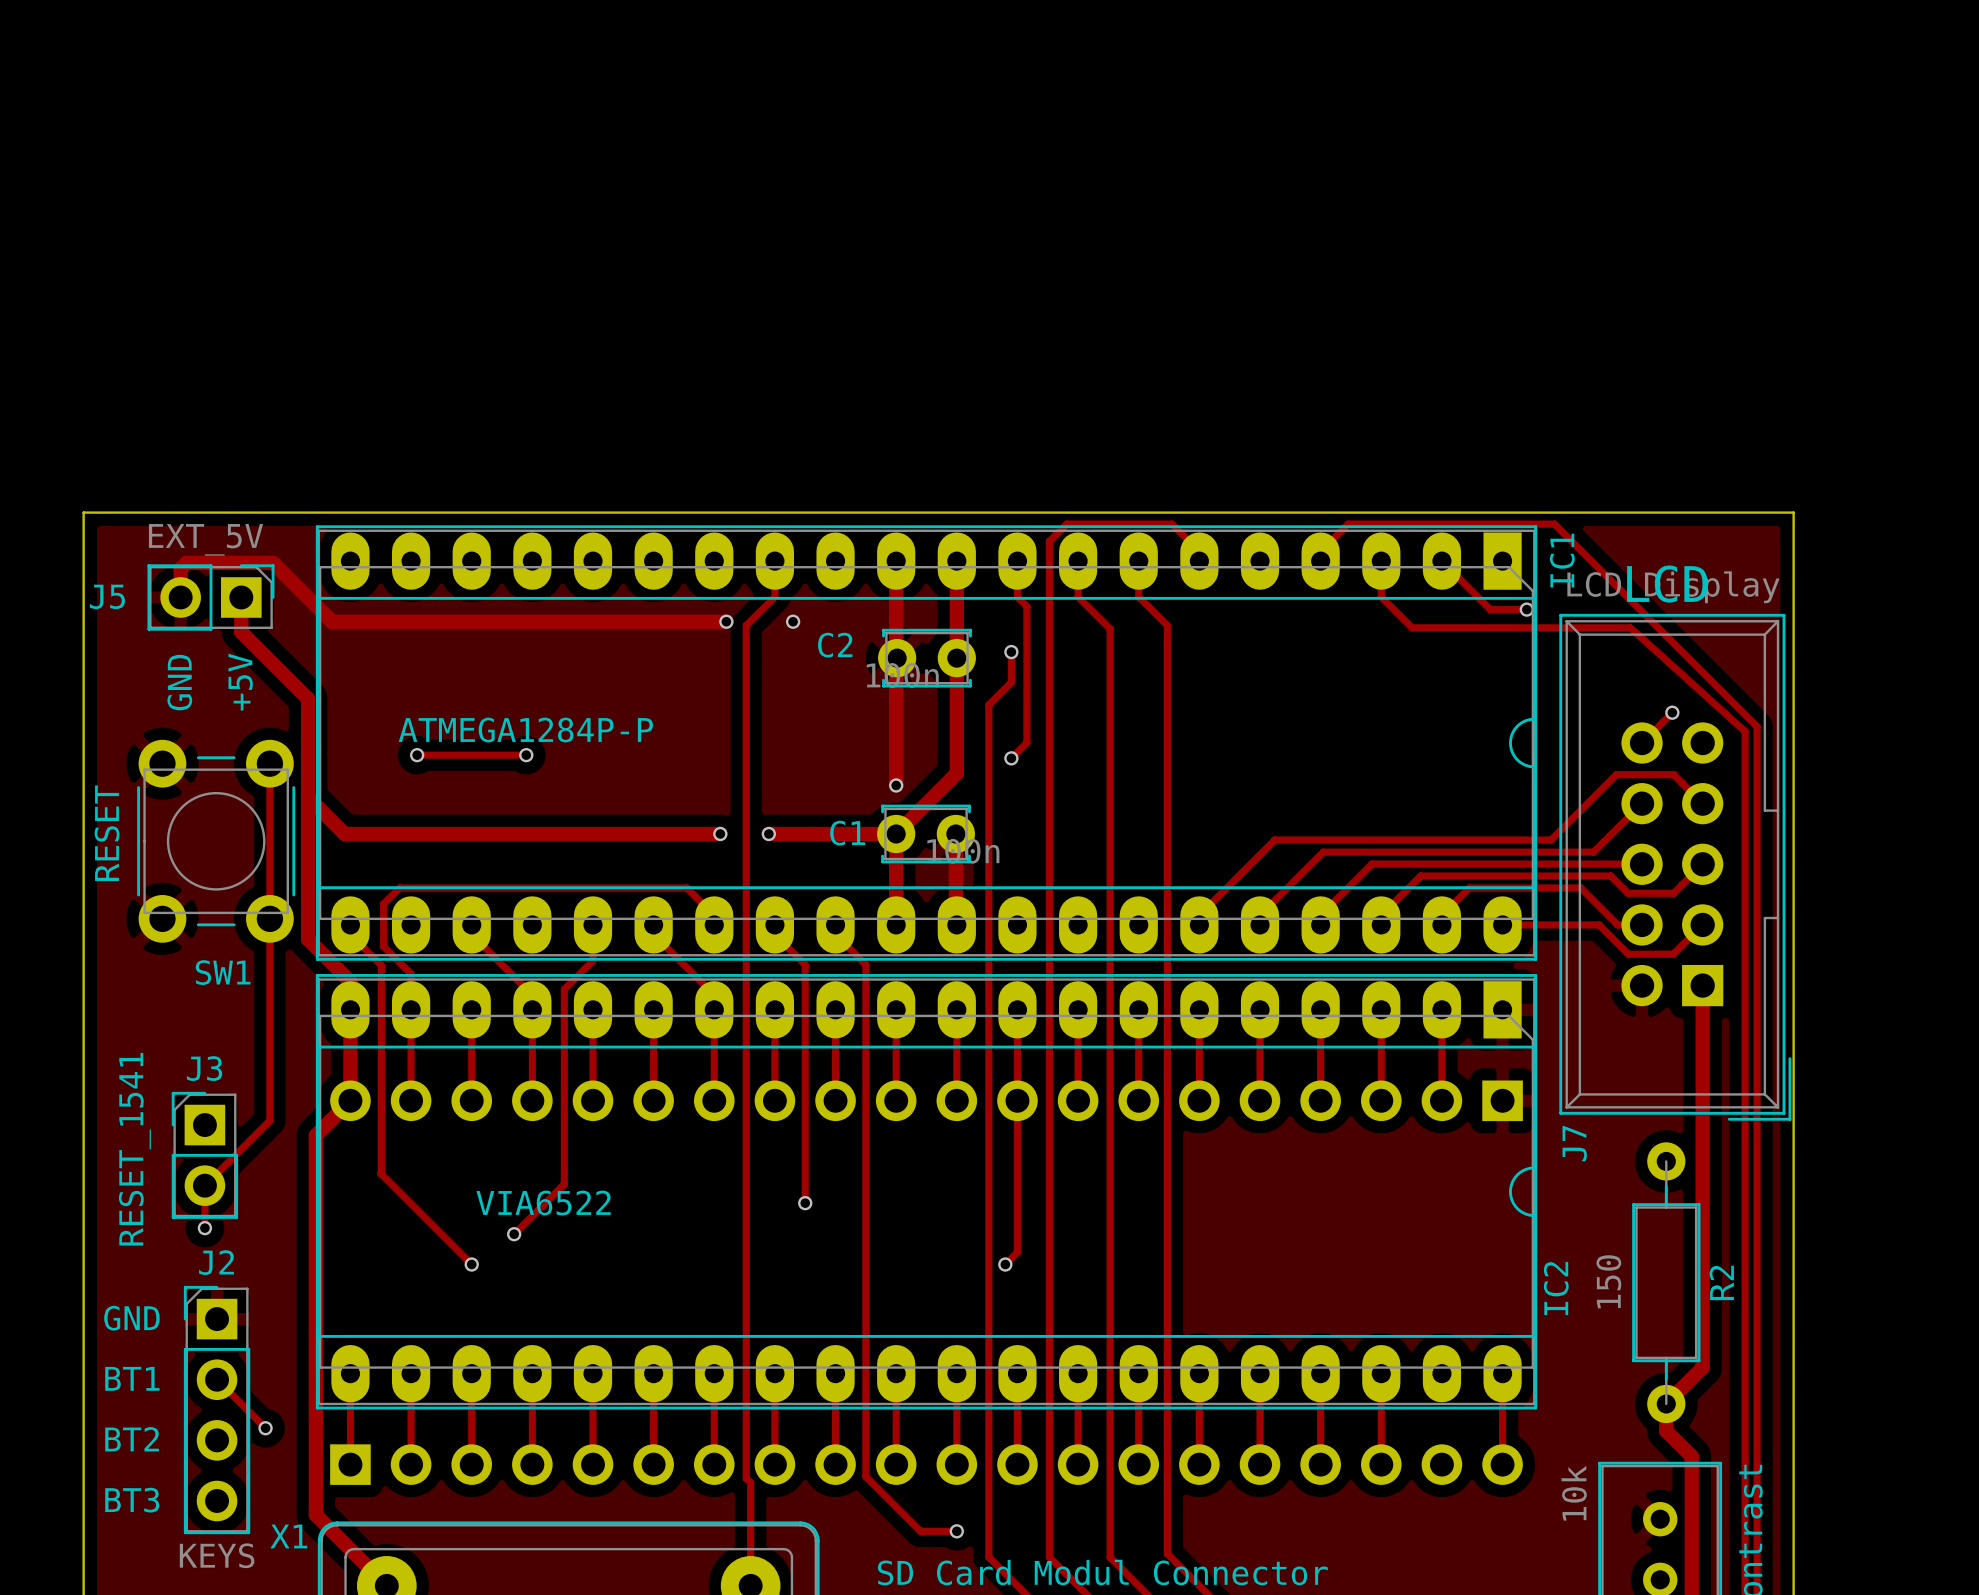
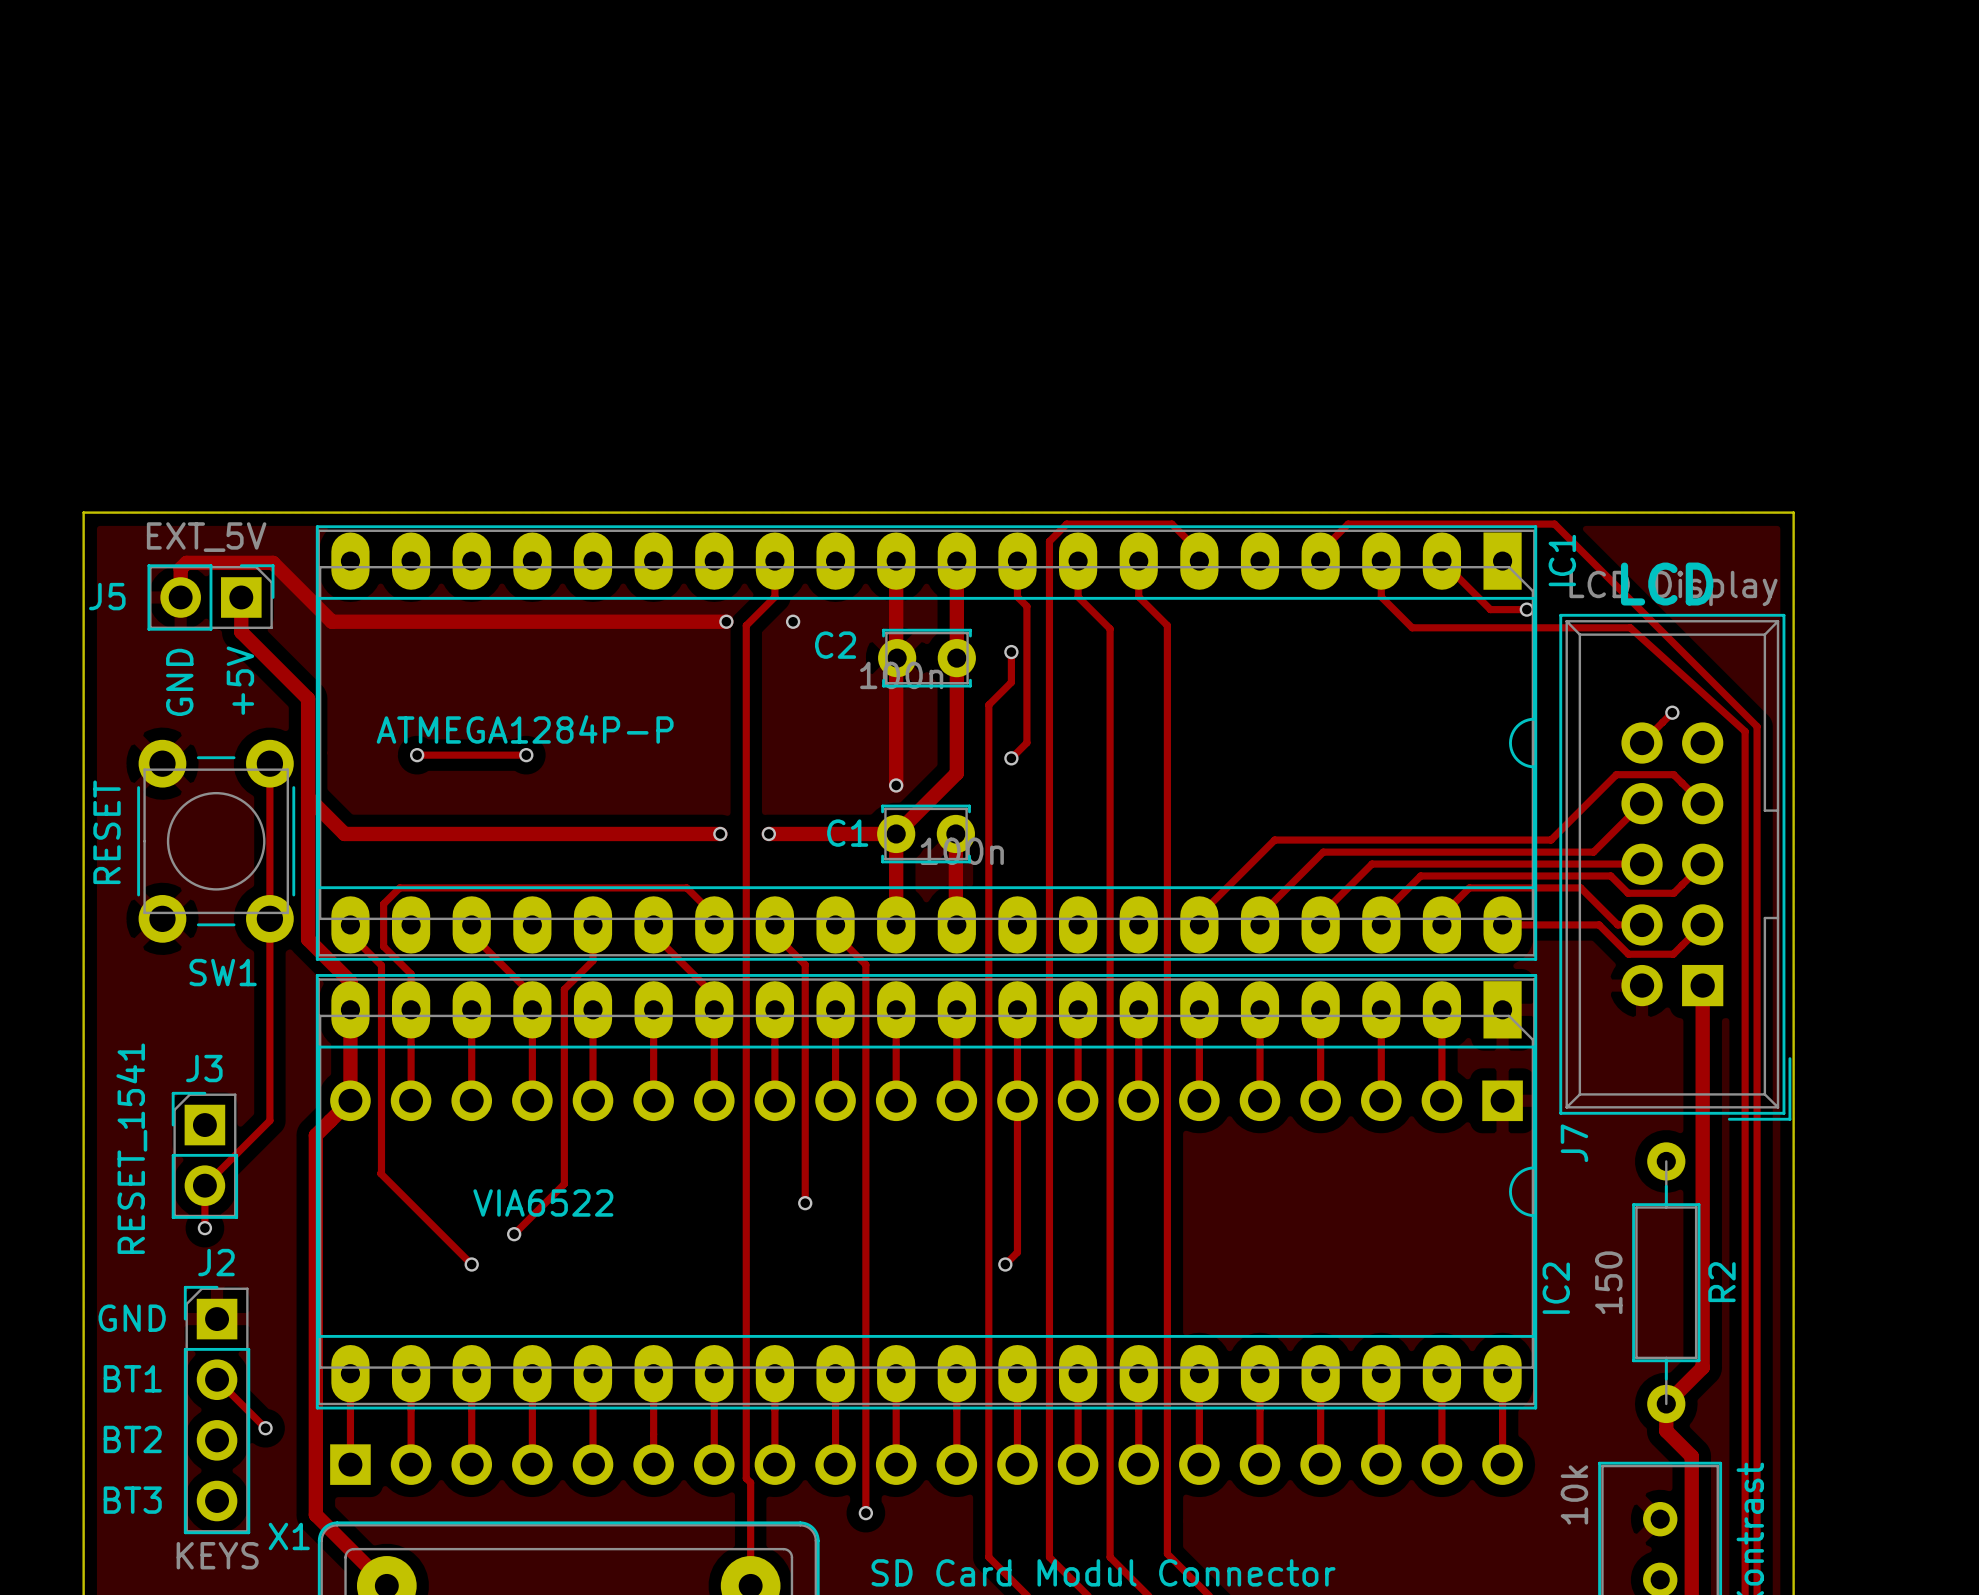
track: none -> (1441, 1373) (1441, 1464)
track: (865, 1476) (920, 1531) (956, 1531) -> (865, 1476) (865, 1513)
via position: (956, 1531) -> (865, 1513)

